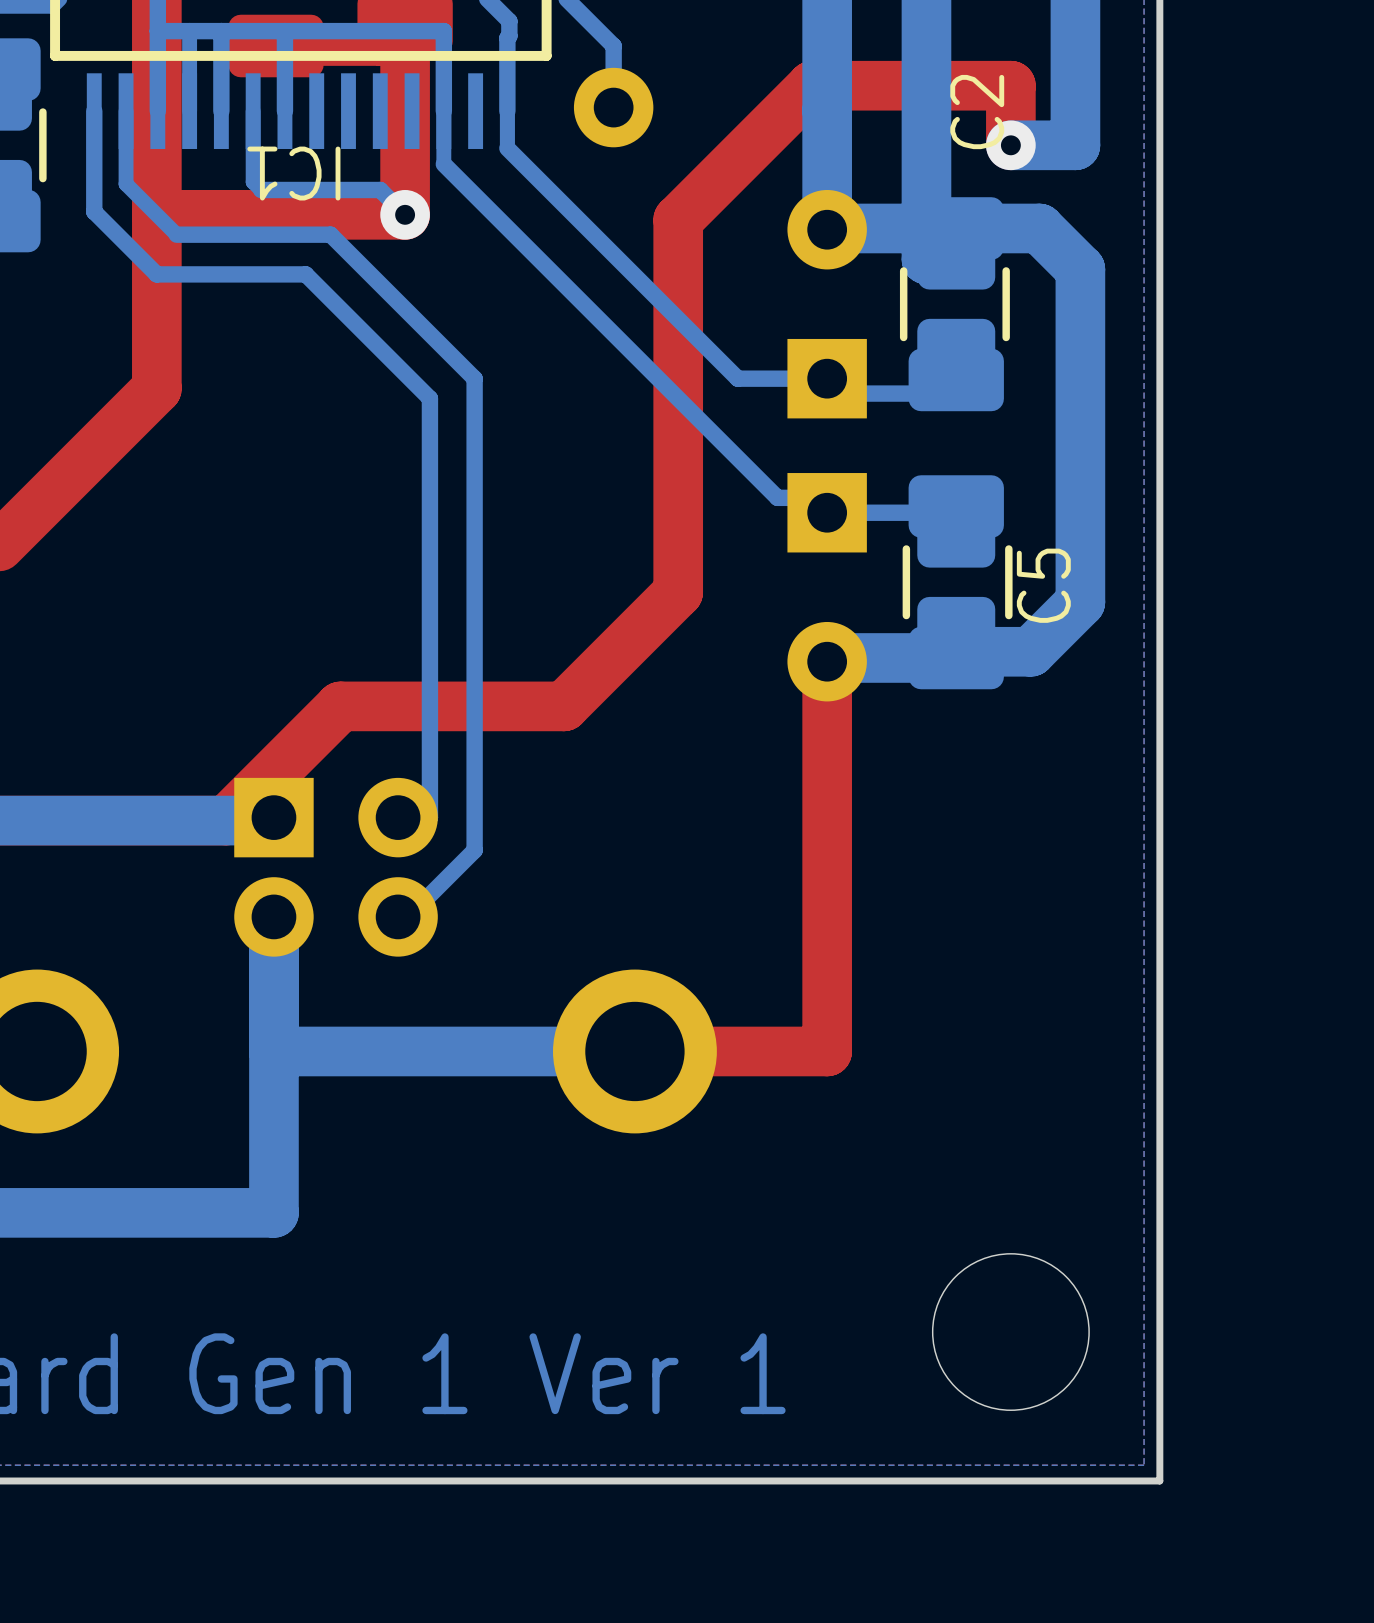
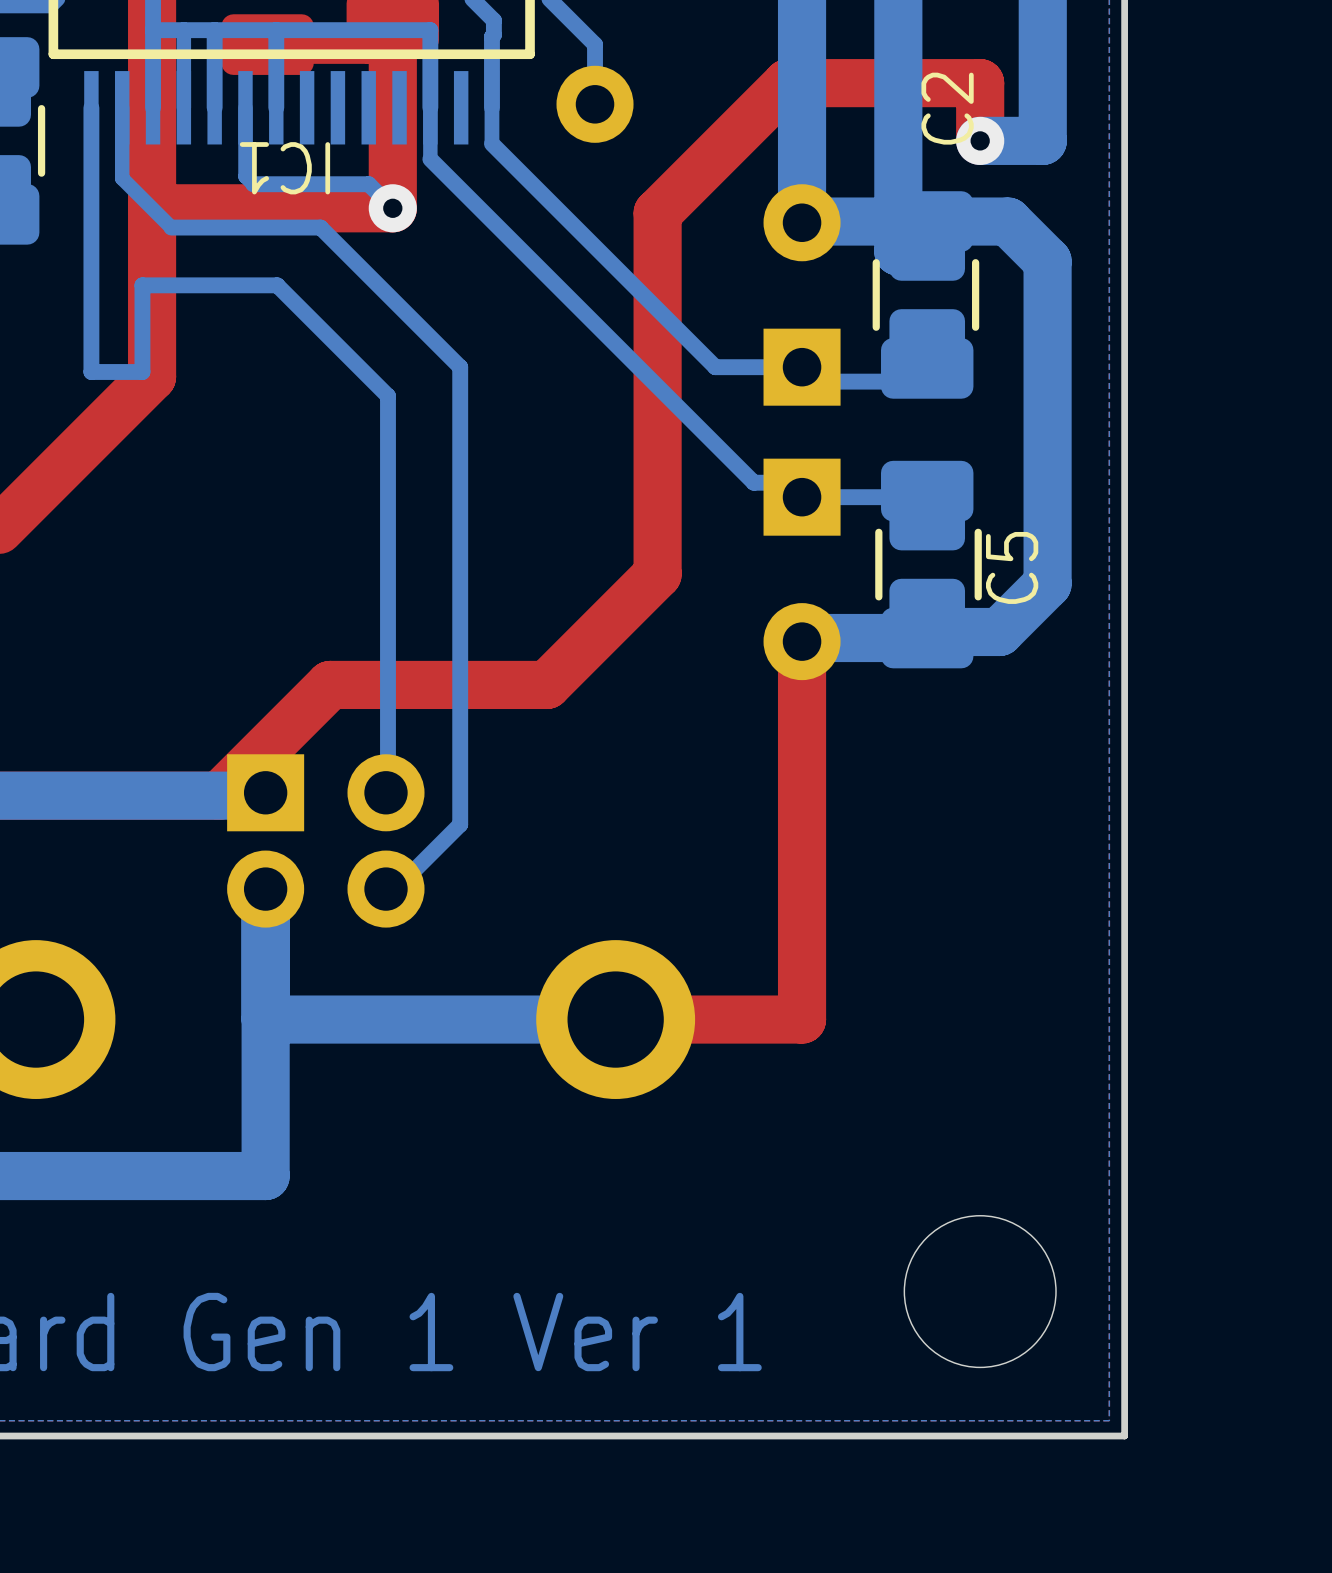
bottom track: (94, 211) (156, 274) (305, 274) (429, 398) (429, 817) (400, 817) -> (91, 205) (91, 371) (142, 371) (142, 285) (277, 285) (387, 396) (387, 792)

